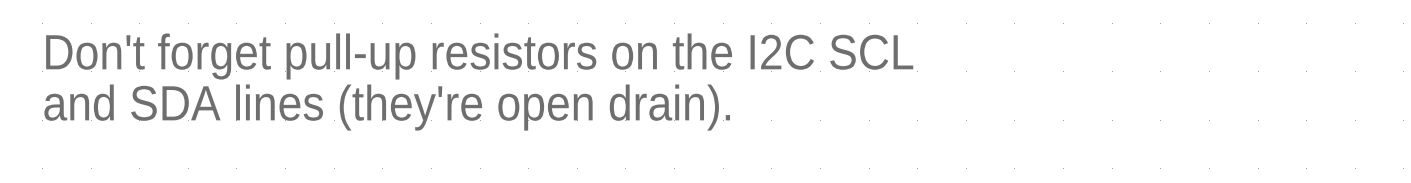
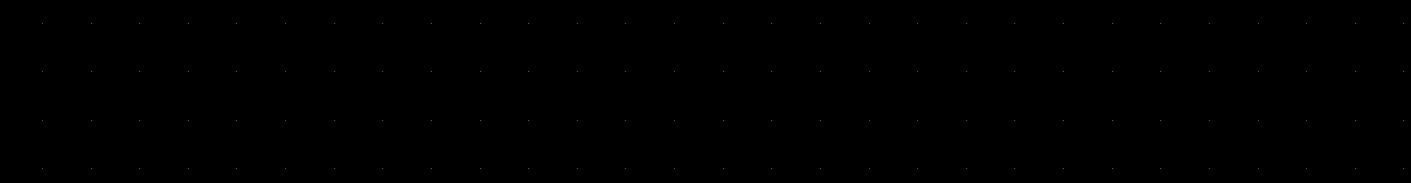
text: Don't forget pull-up resistors on the I2C SCL (479, 56) -> none
text: and SDA lines (they're open drain). (387, 107) -> none

